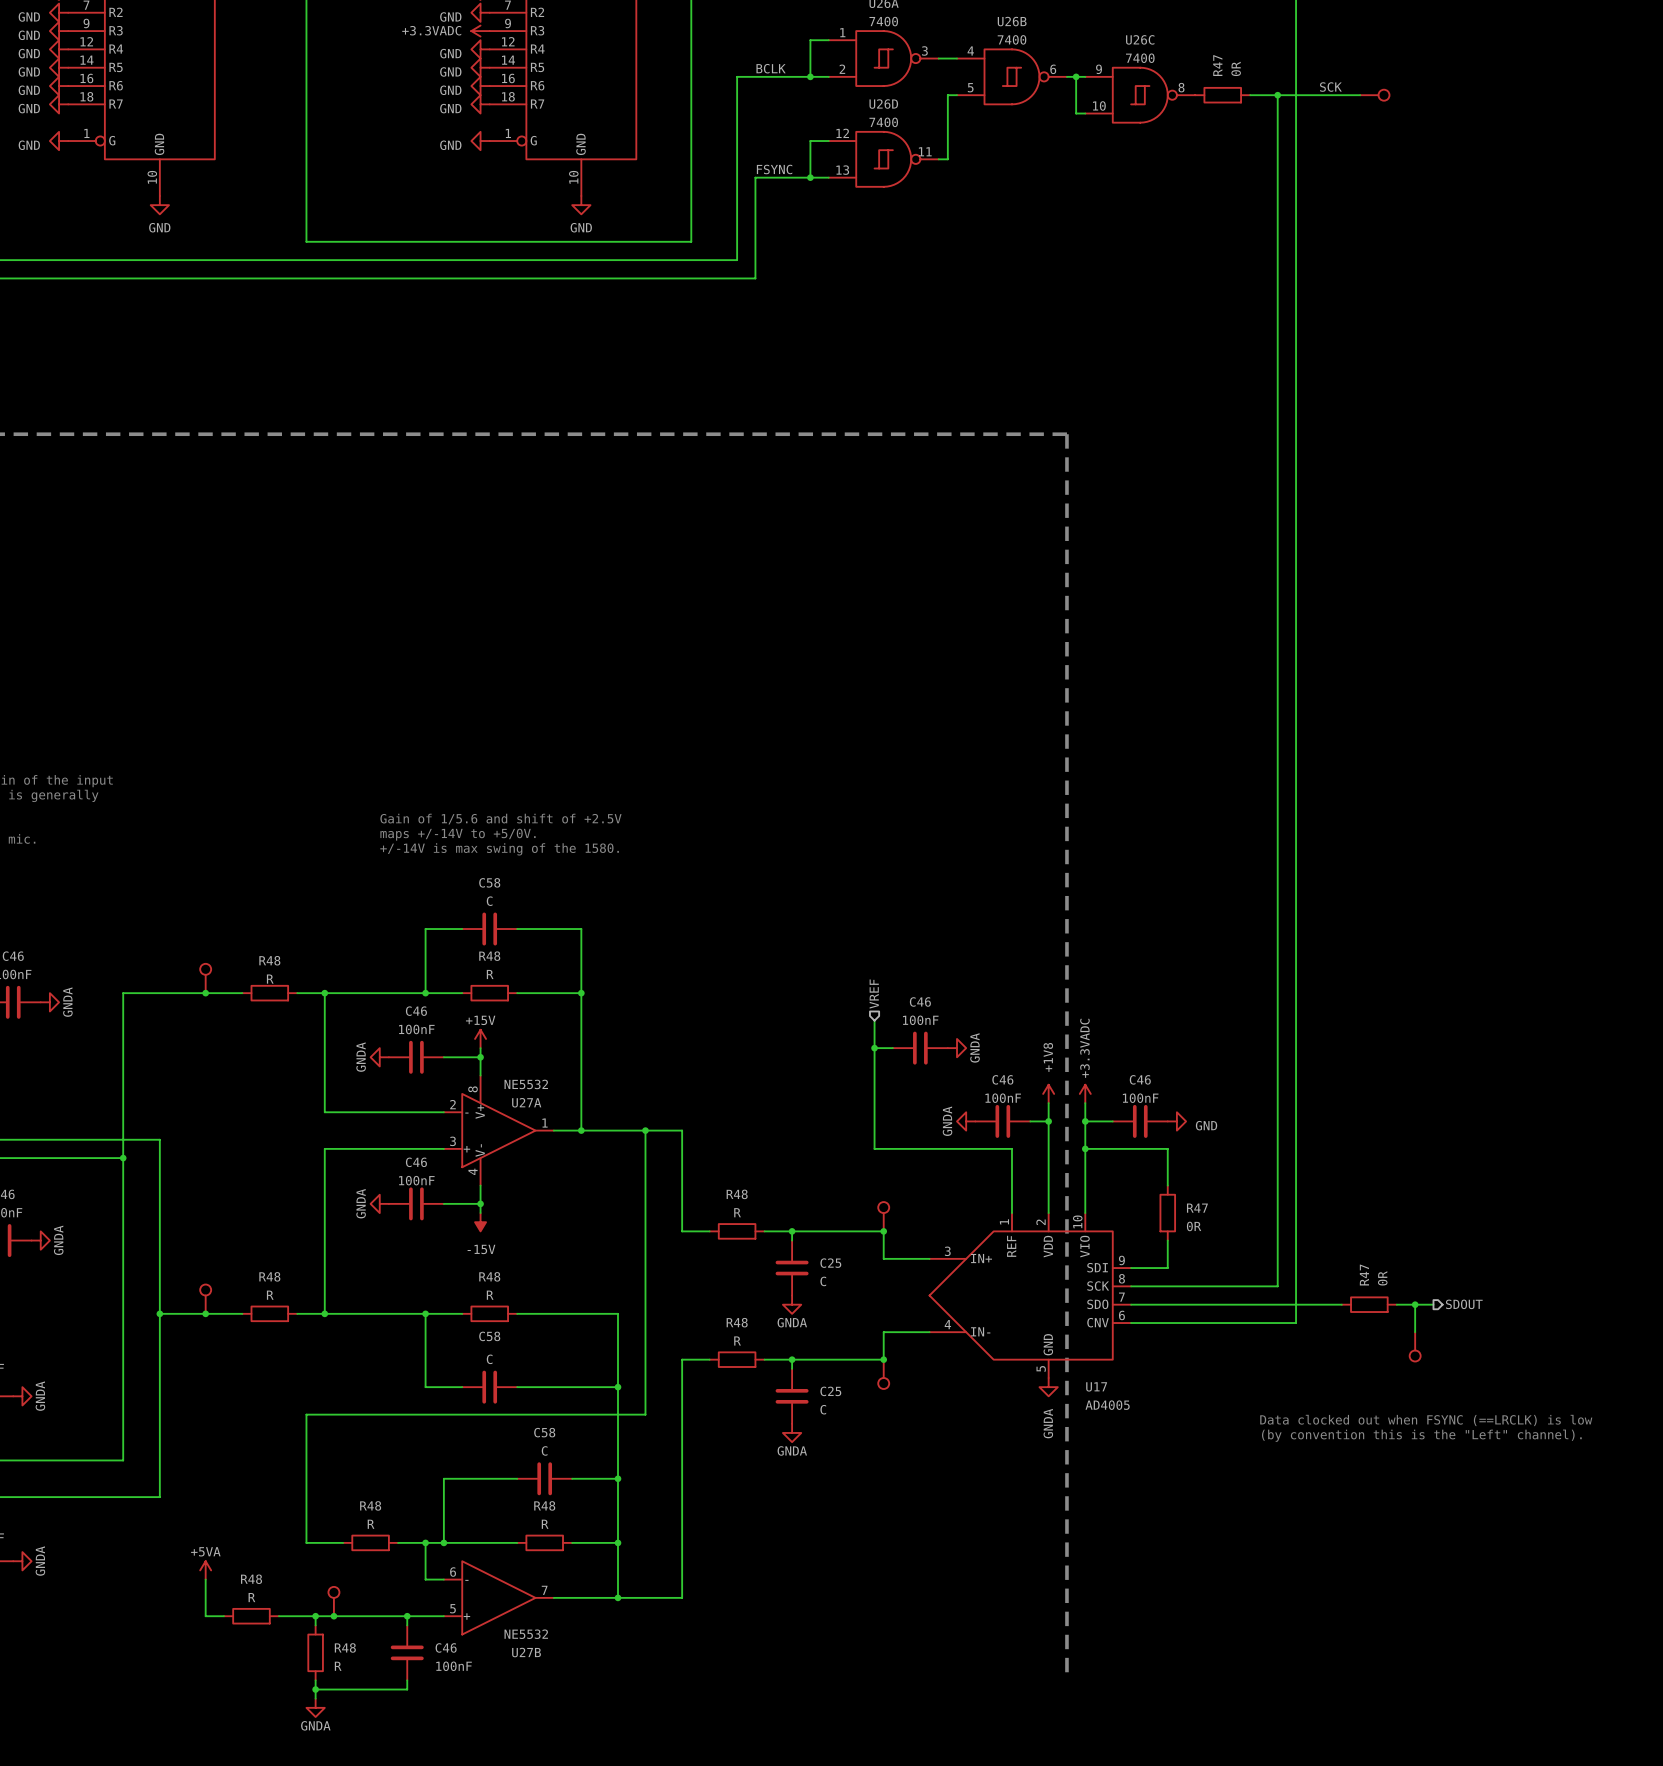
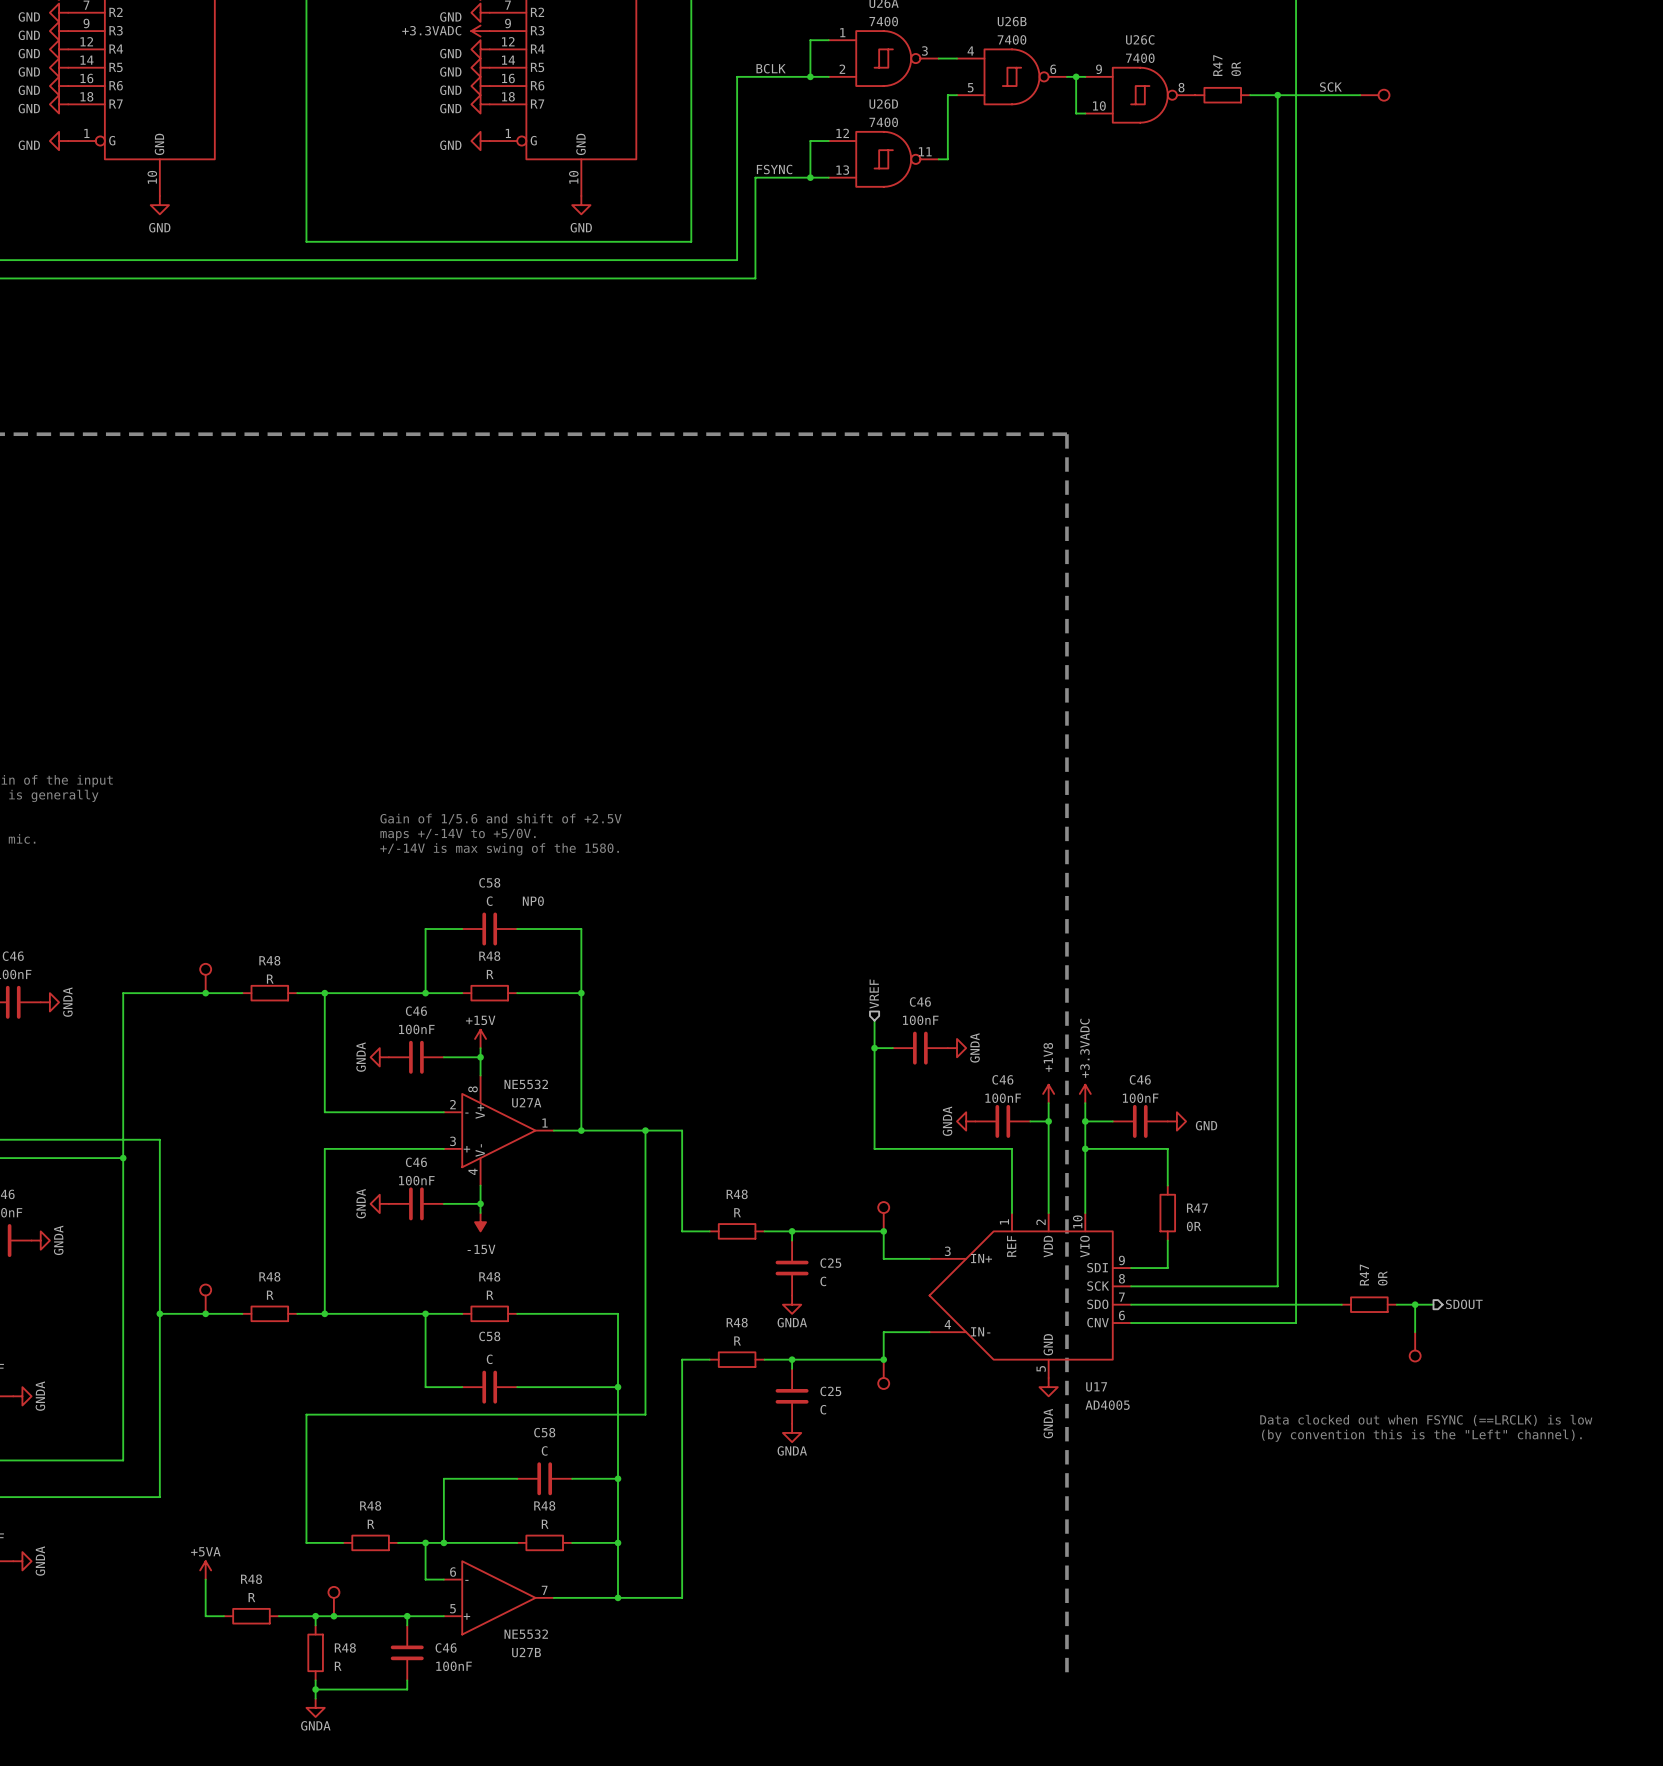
C58 text: none -> NP0 (533, 901)

